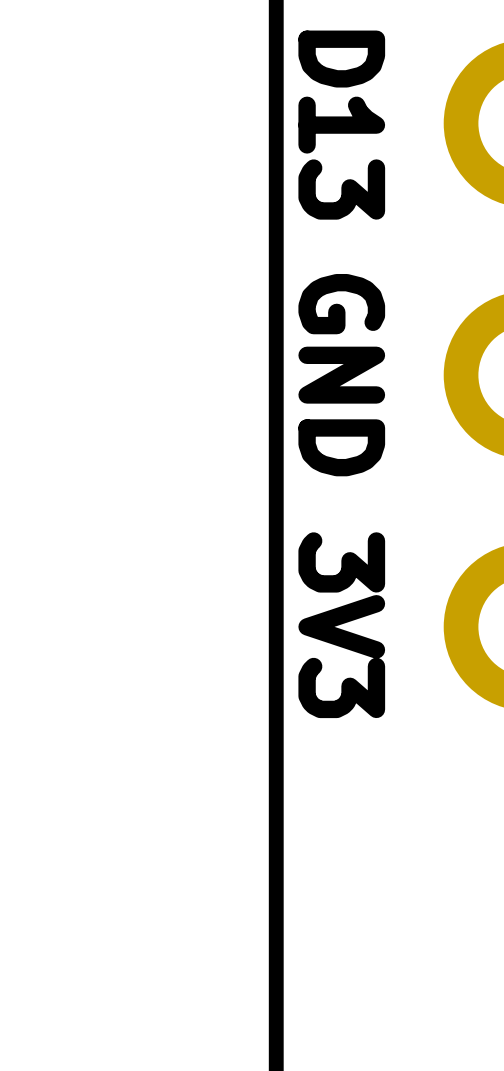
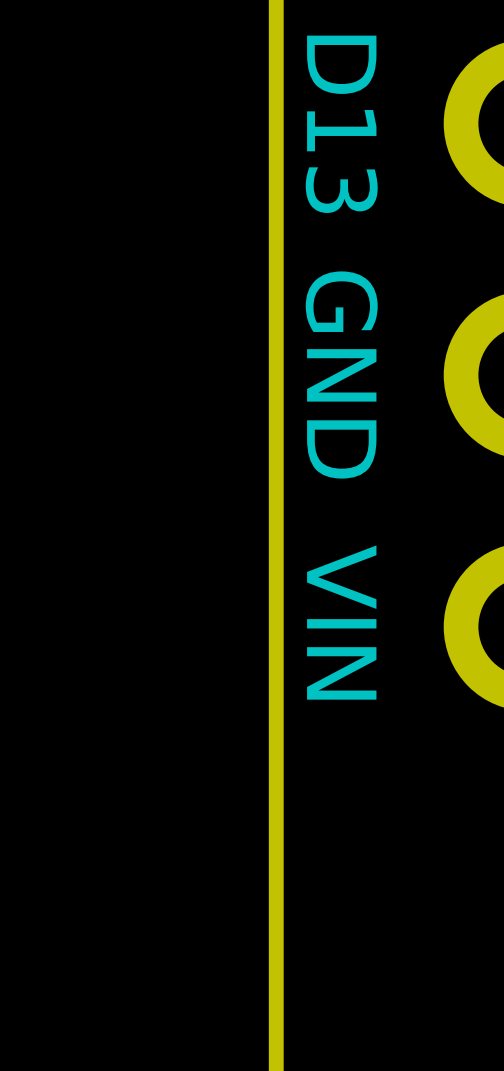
text: 3V3 (341, 625) -> VIN (341, 622)

